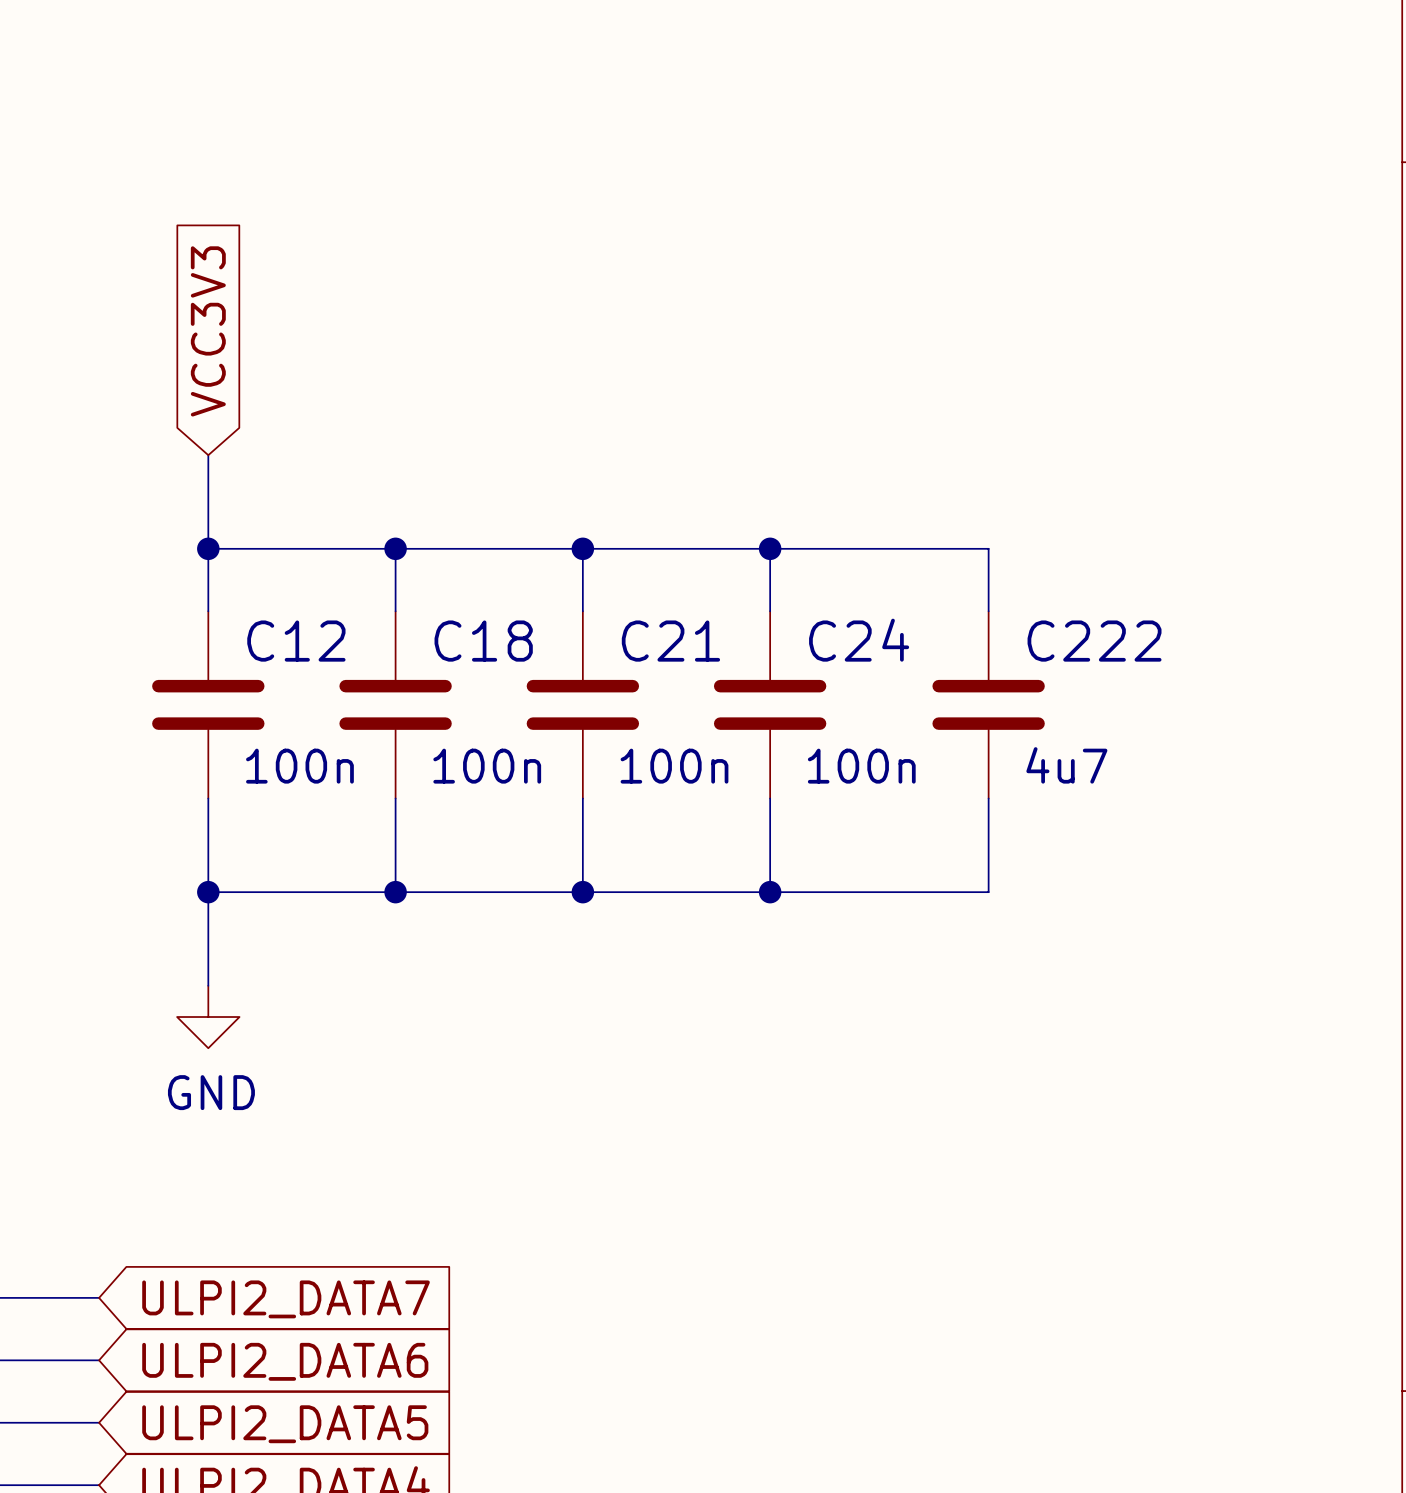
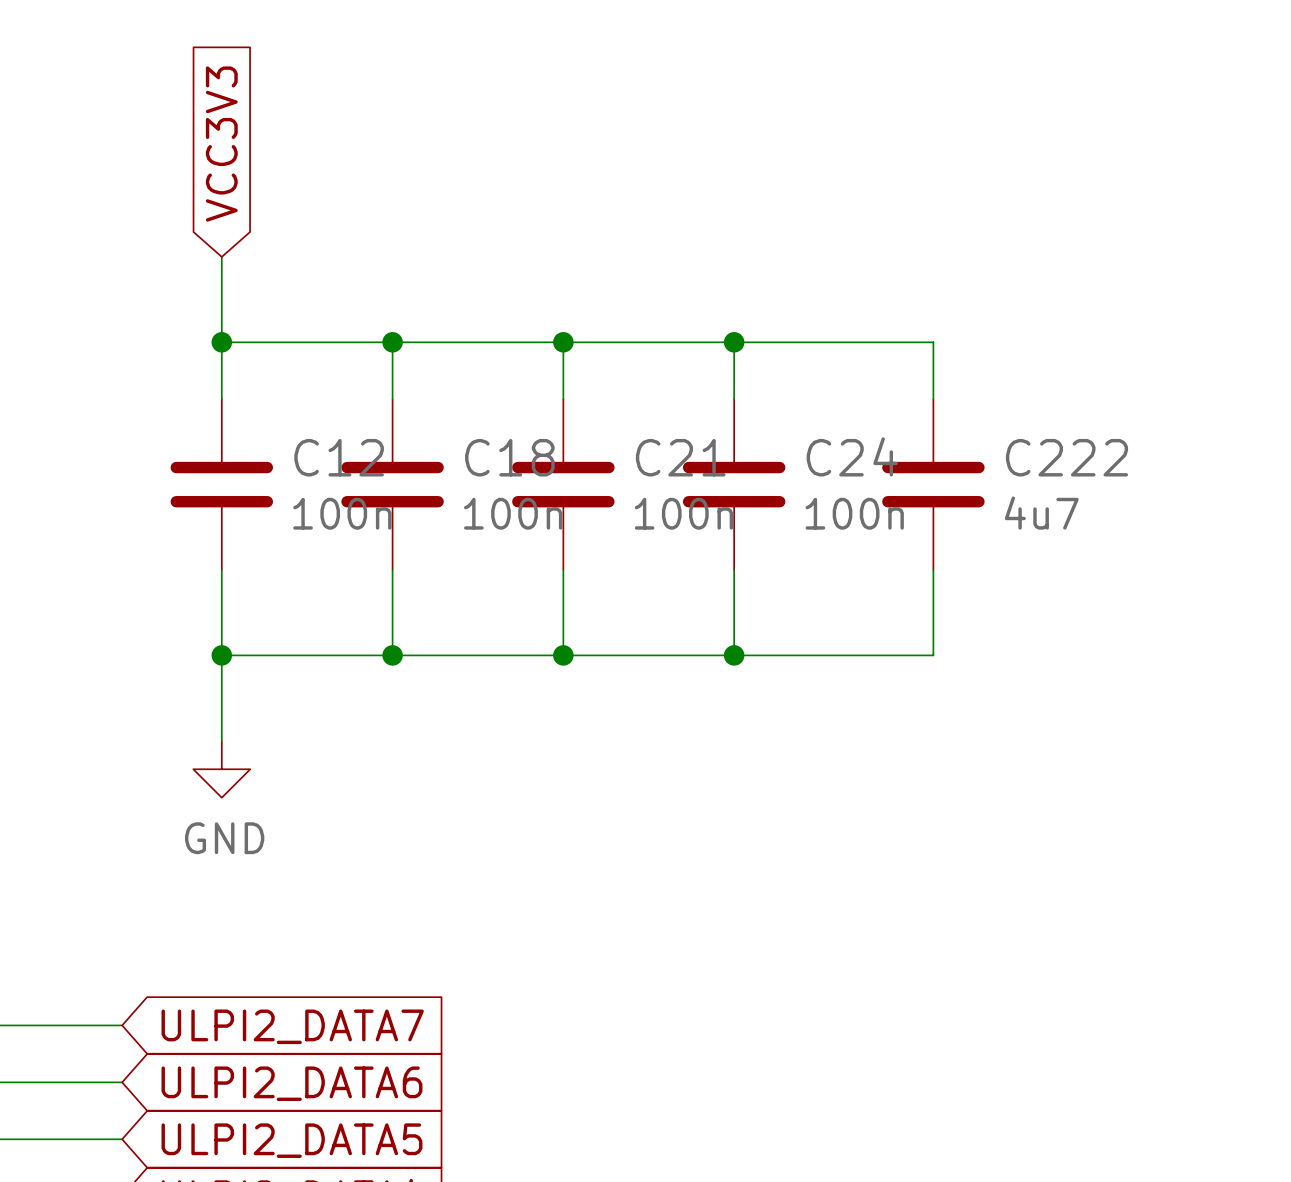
C24 name position: C24 (859, 640) -> C24 (852, 456)
C12 name position: C12 (296, 641) -> C12 (339, 457)
C18 name position: C18 (483, 641) -> C18 (509, 457)
C21 name position: C21 (670, 641) -> C21 (680, 457)
C222 name position: C222 (1094, 641) -> C222 (1066, 457)
C222 text position: 4u7 (1066, 765) -> 4u7 (1041, 513)
C12 text position: 100n (299, 766) -> 100n (342, 513)
C18 text position: 100n (487, 766) -> 100n (513, 513)
C21 text position: 100n (674, 766) -> 100n (683, 513)
C24 text position: 100n (861, 766) -> 100n (854, 513)

